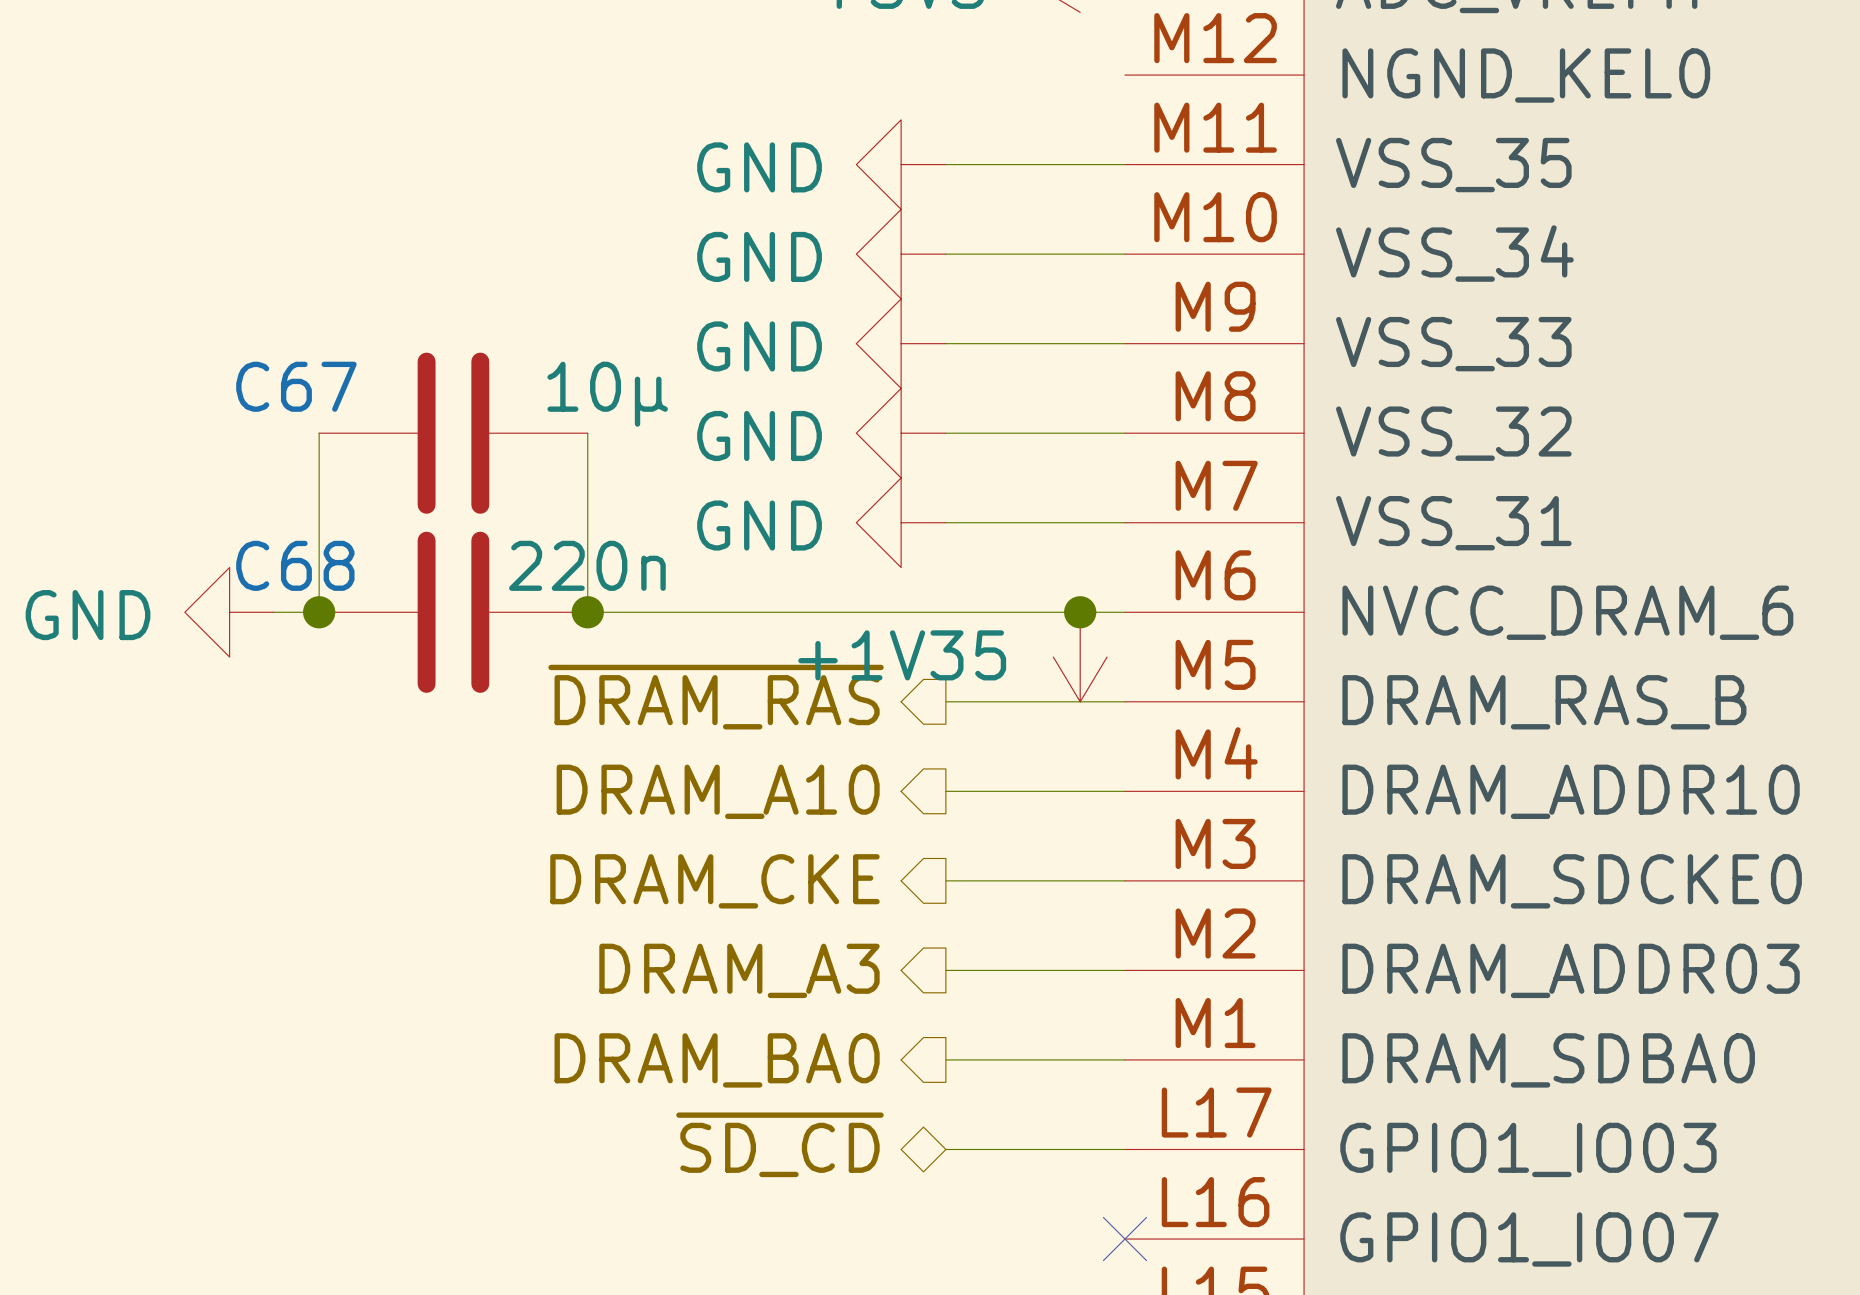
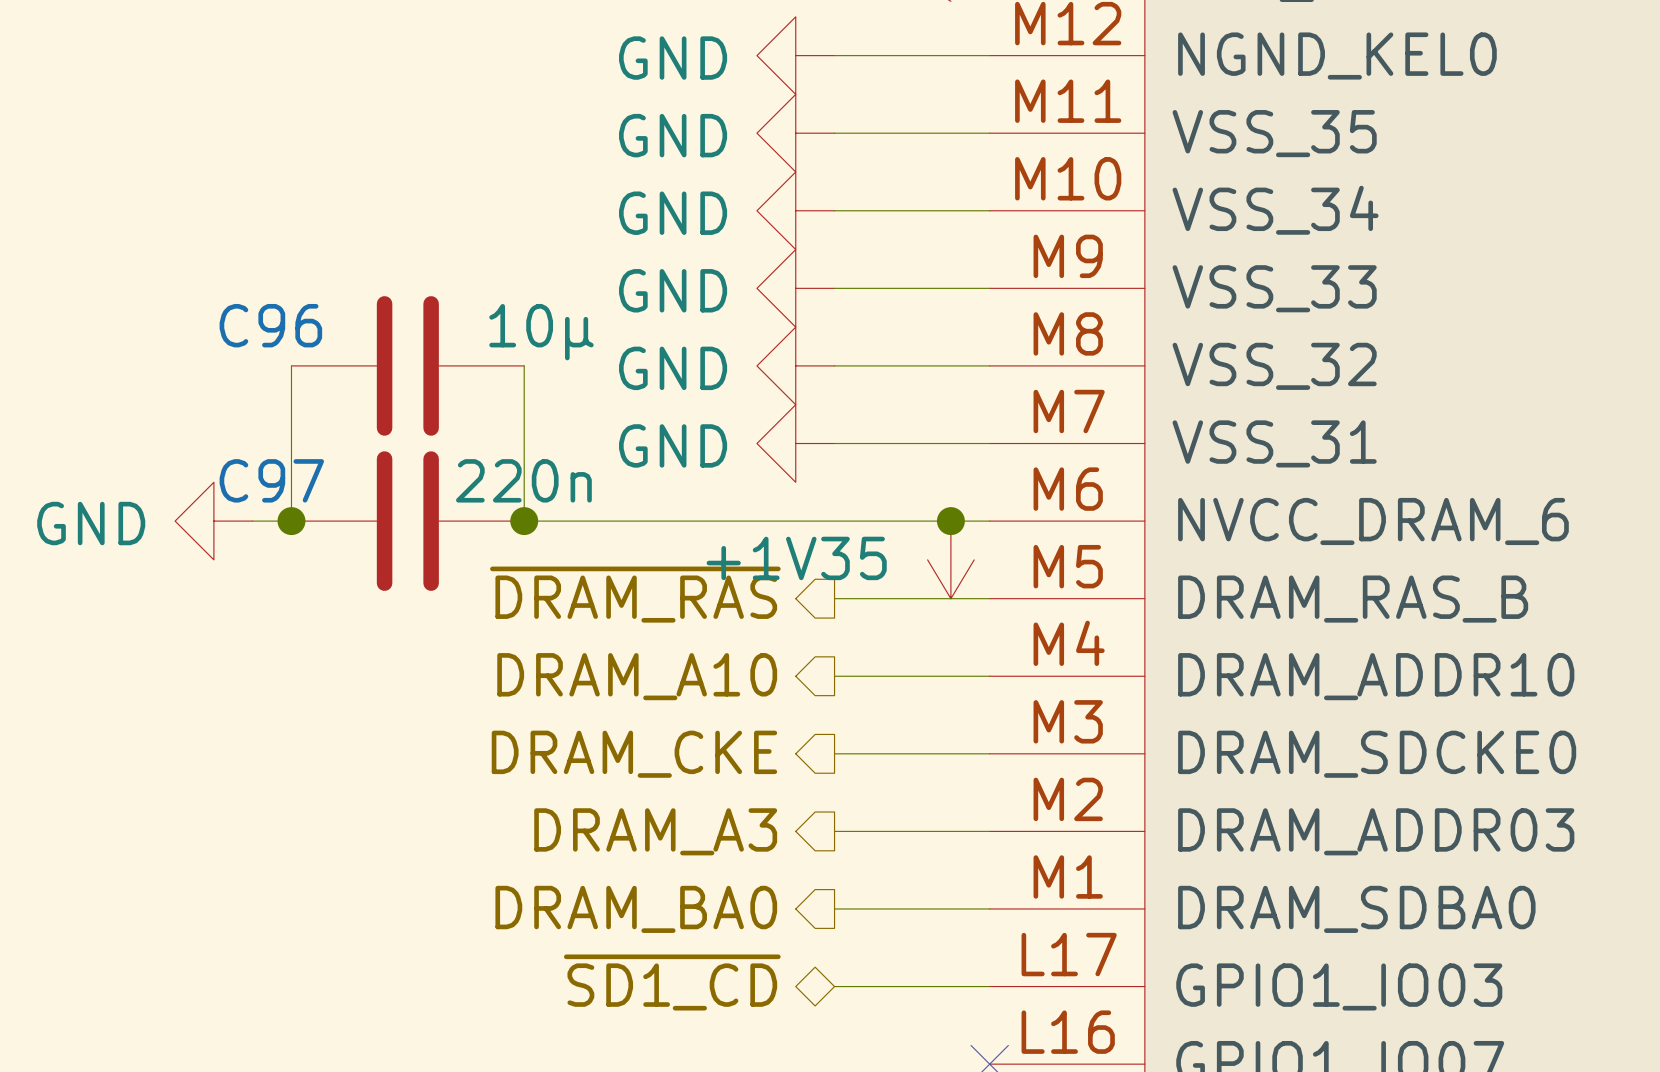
power symbol: none -> GND (795, 55)
wire: none -> (834, 55) (989, 55)
C67 name: C67 (296, 386) -> C96 (270, 325)
C68 name: C68 (295, 565) -> C97 (271, 480)
hierarchical label: ~{SD_CD} (779, 1144) -> ~{SD1_CD} (672, 982)

